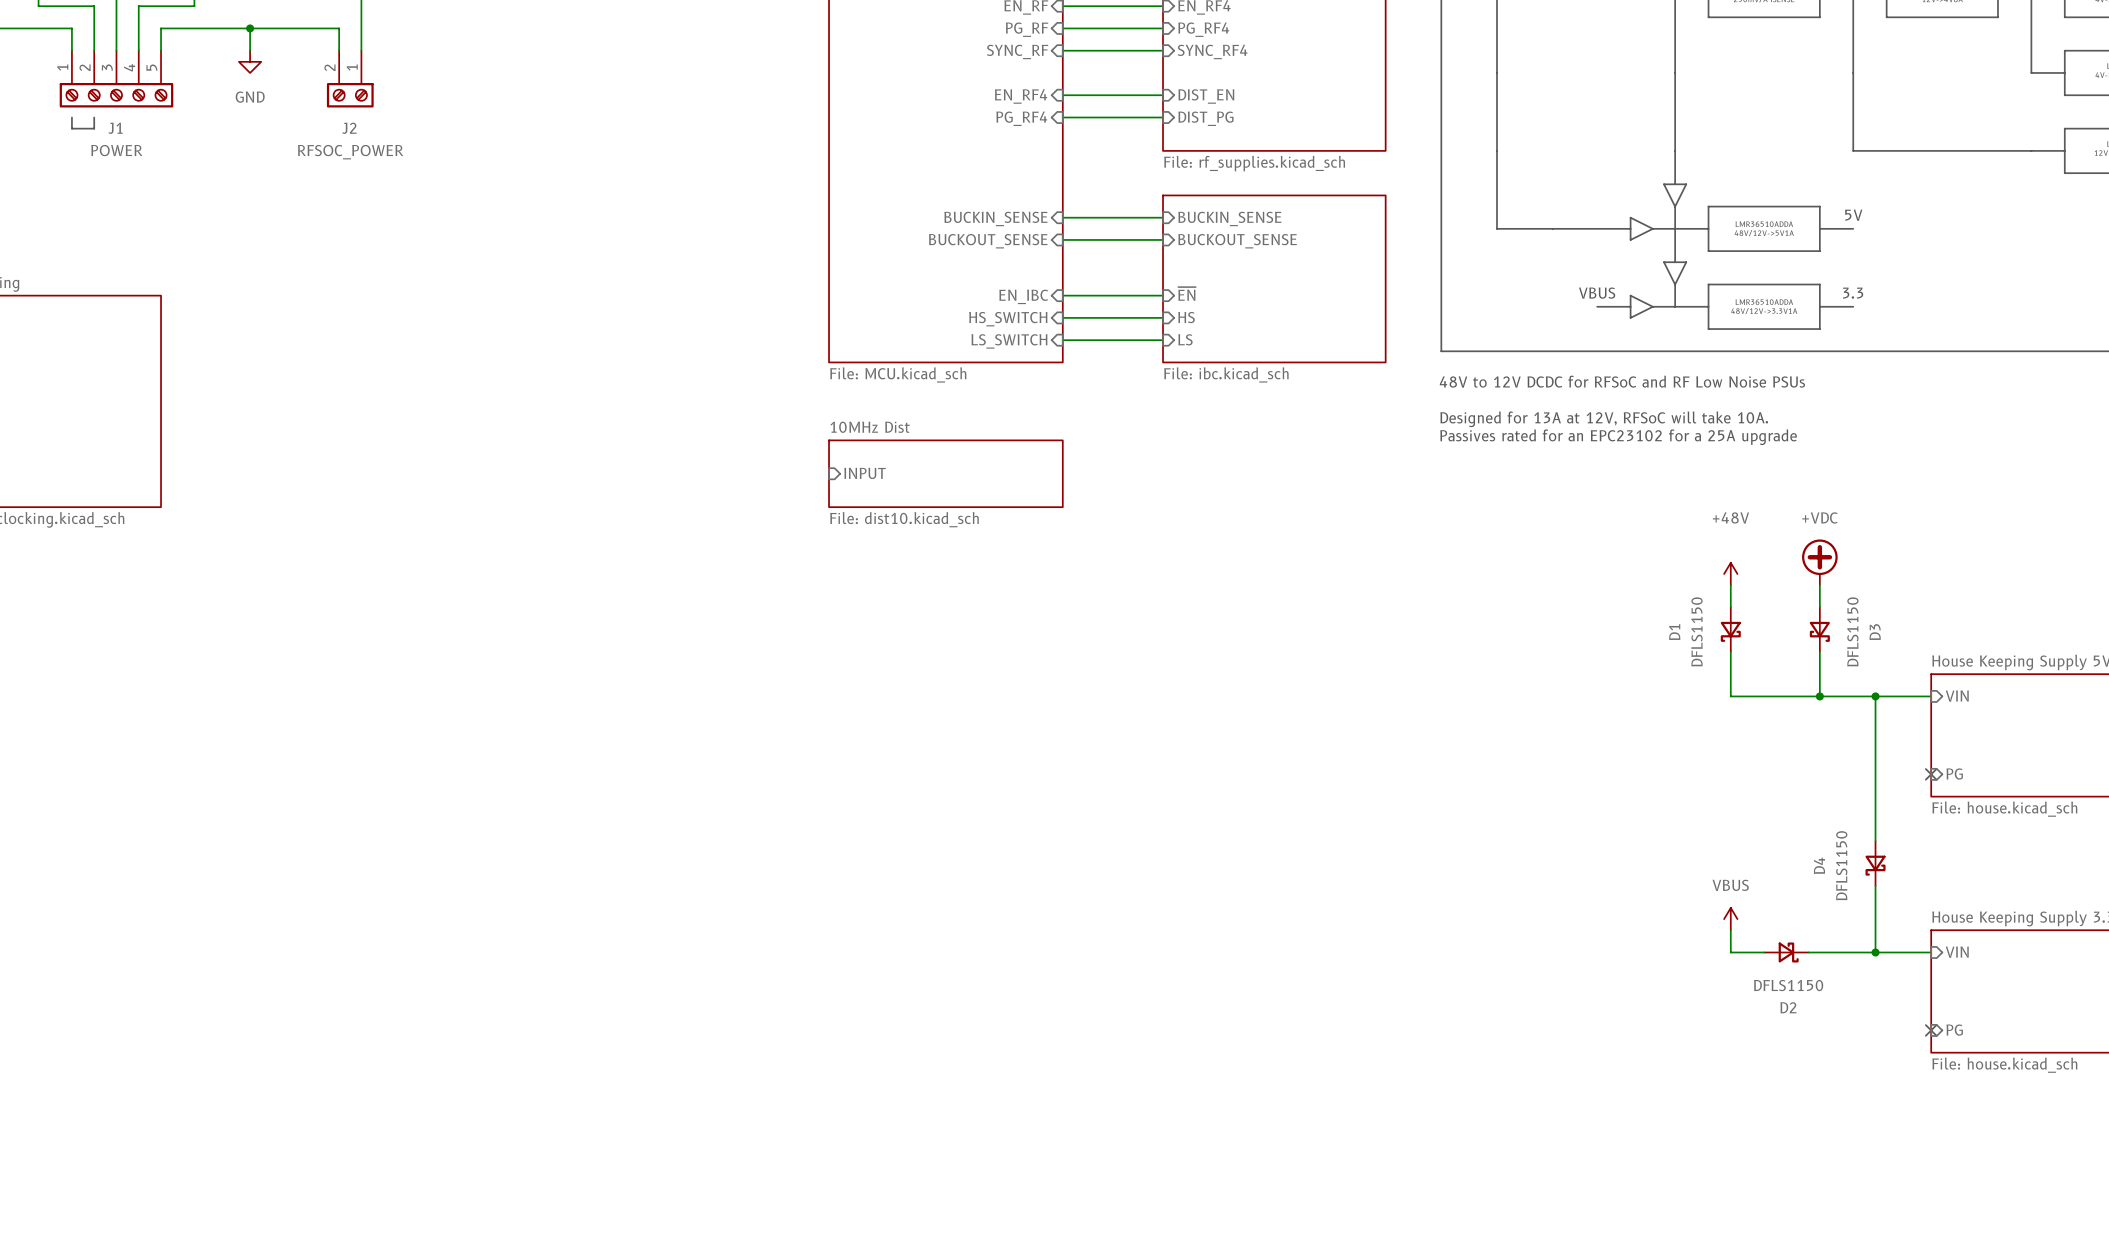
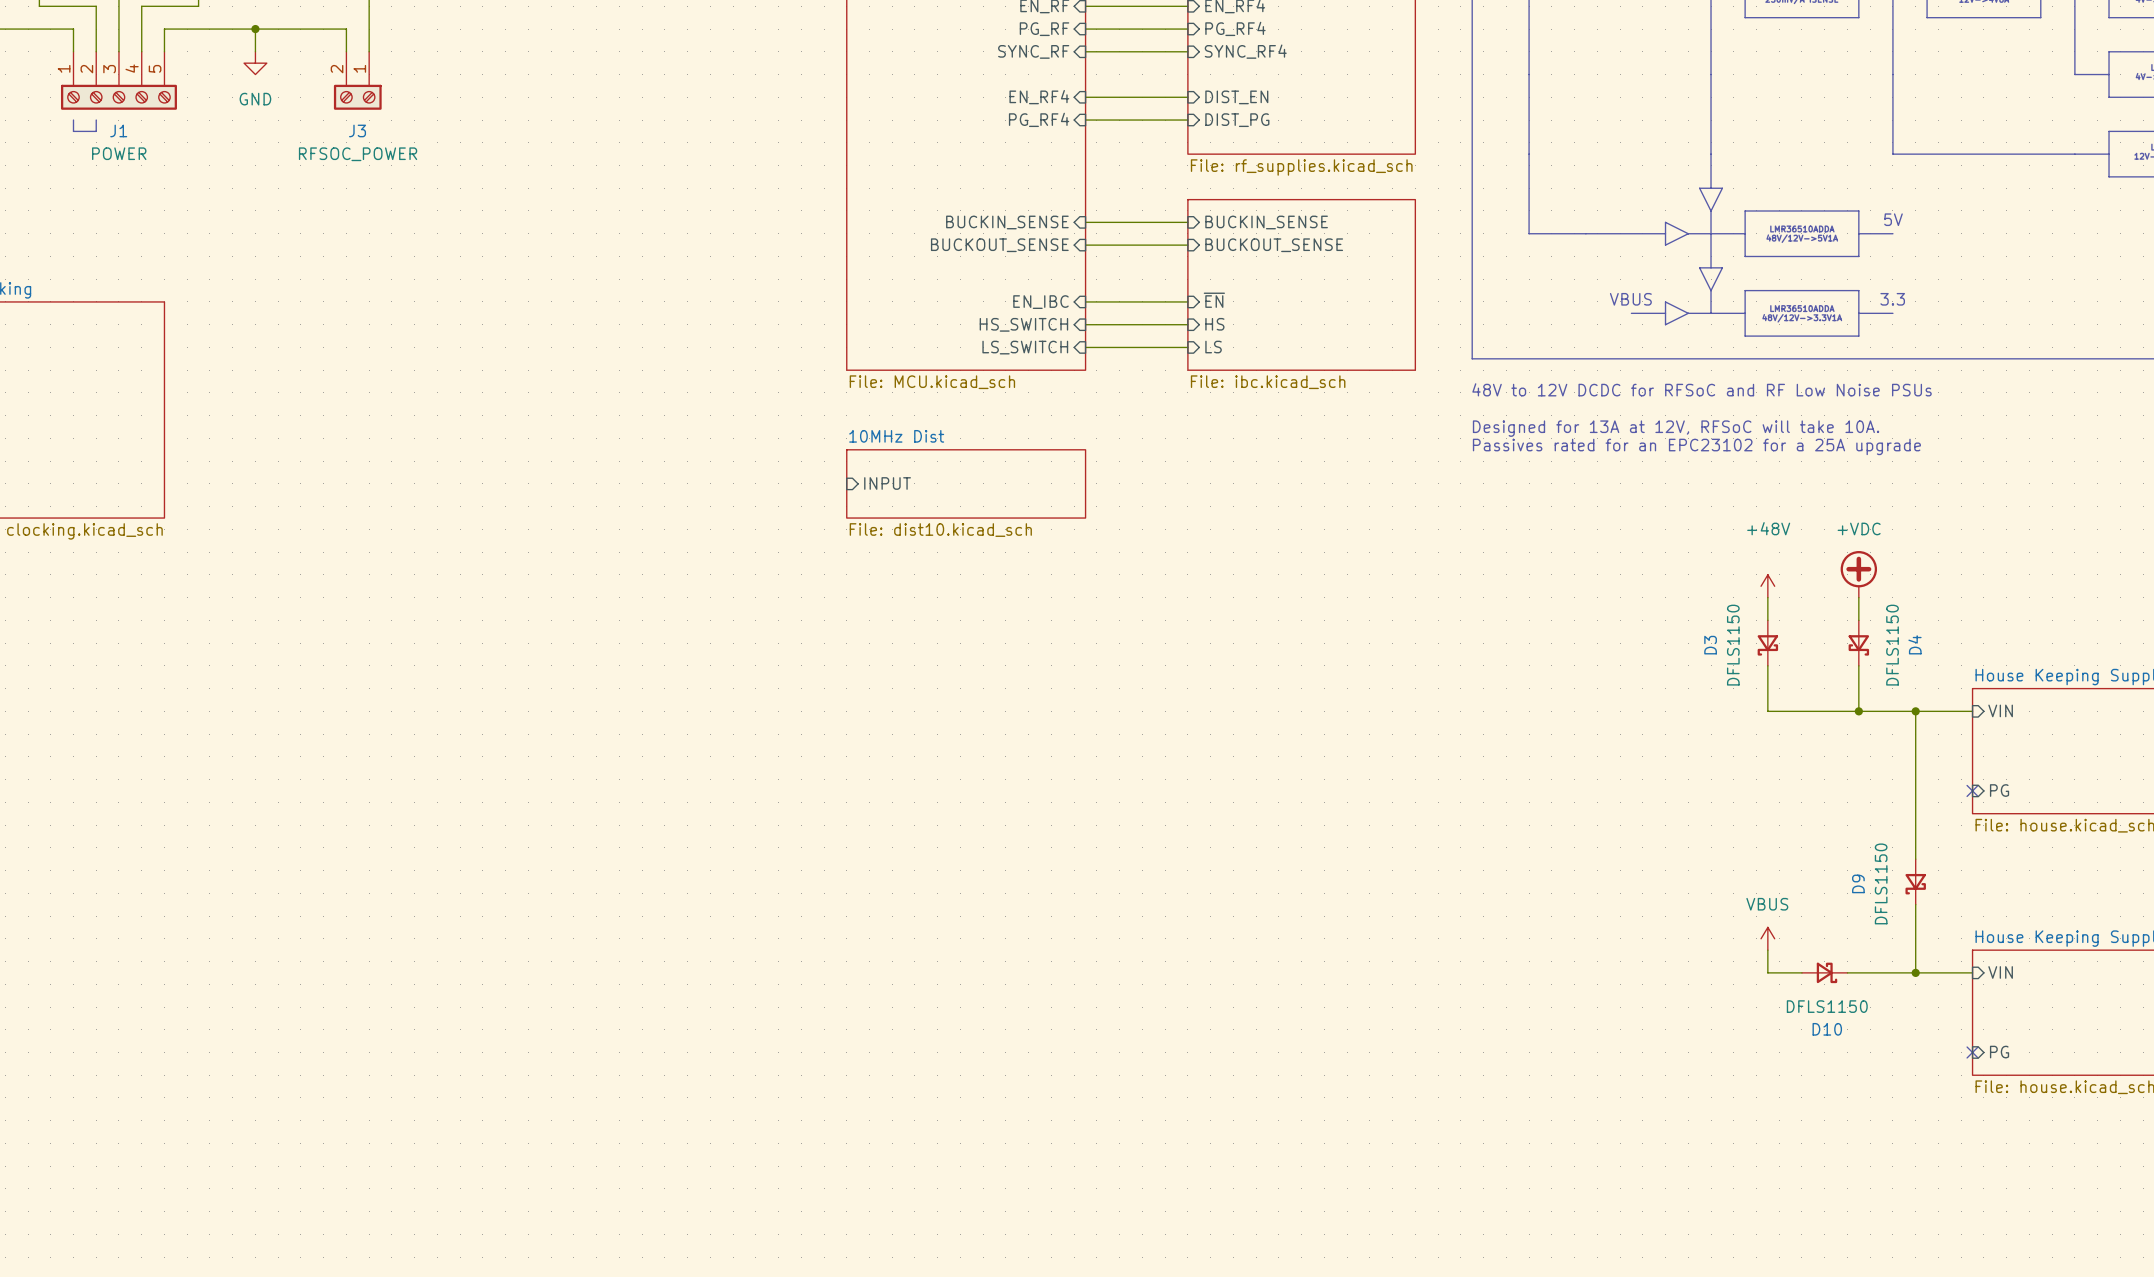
J2 name: J2 (349, 128) -> J3 (357, 130)
D1 name: D1 (1674, 632) -> D3 (1710, 645)
D3 name: D3 (1875, 632) -> D4 (1915, 644)
D4 name: D4 (1819, 865) -> D9 (1858, 883)
D2 name: D2 (1788, 1007) -> D10 (1827, 1029)

